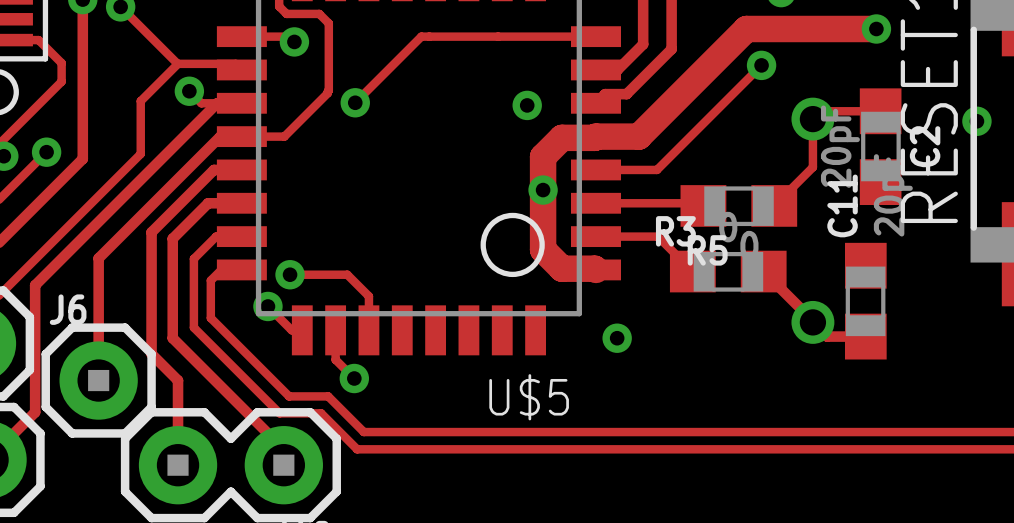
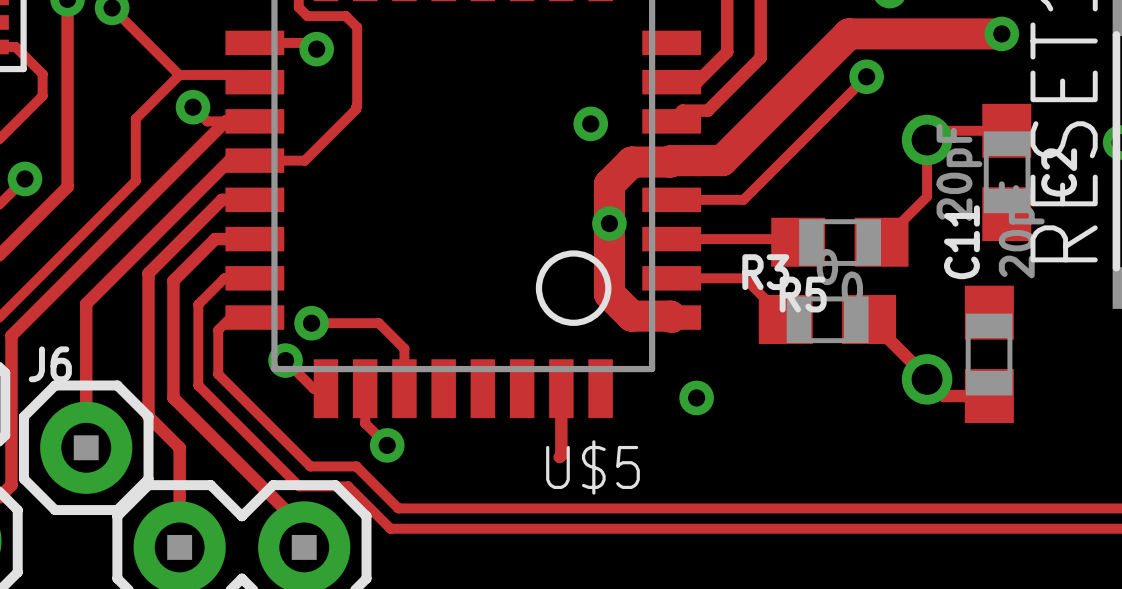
track: (595, 36) (421, 36) (355, 102) -> none
via: (355, 102) -> none
track: none -> (561, 388) (561, 455) (559, 457)

